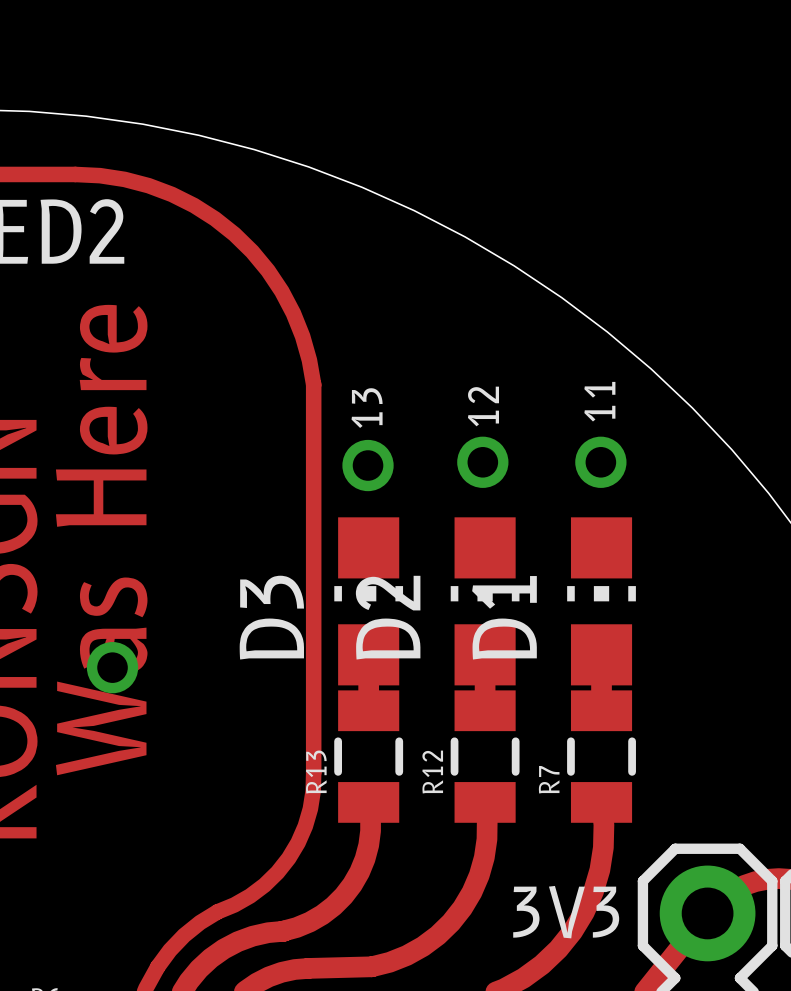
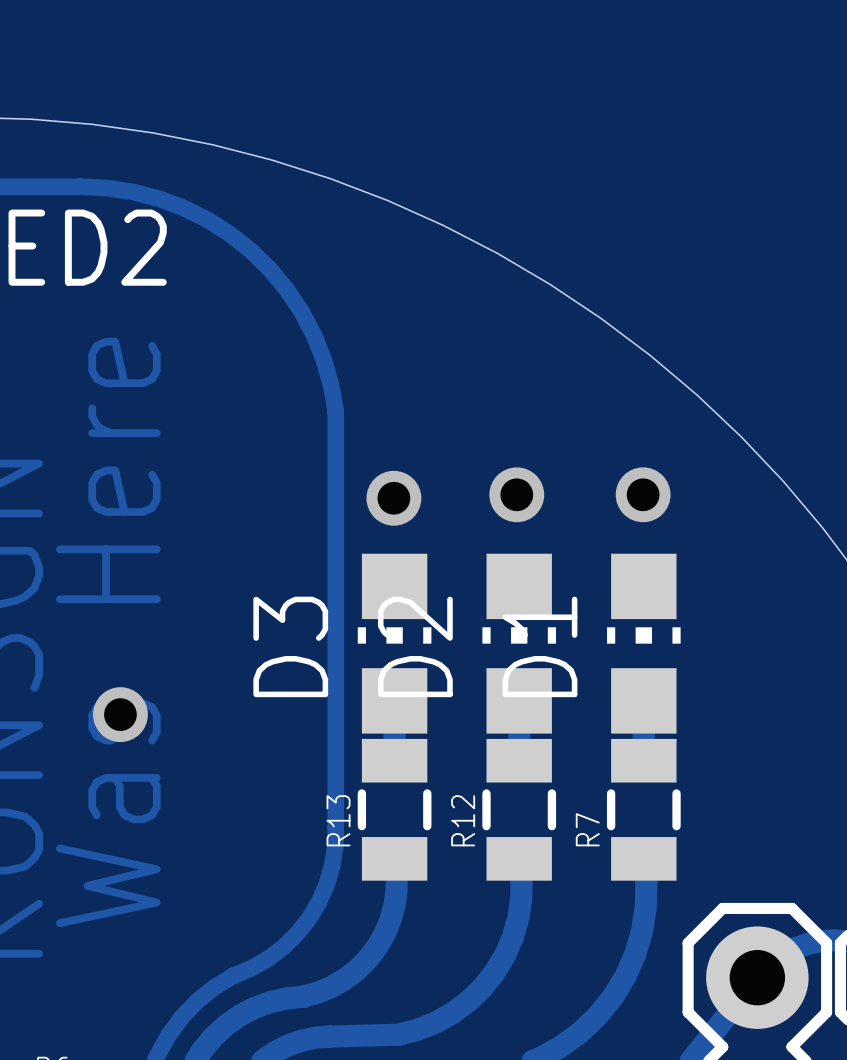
text: 11 (599, 401) -> none
text: 12 (483, 406) -> none
text: 13 (367, 408) -> none
text: 3V3 (566, 912) -> none

